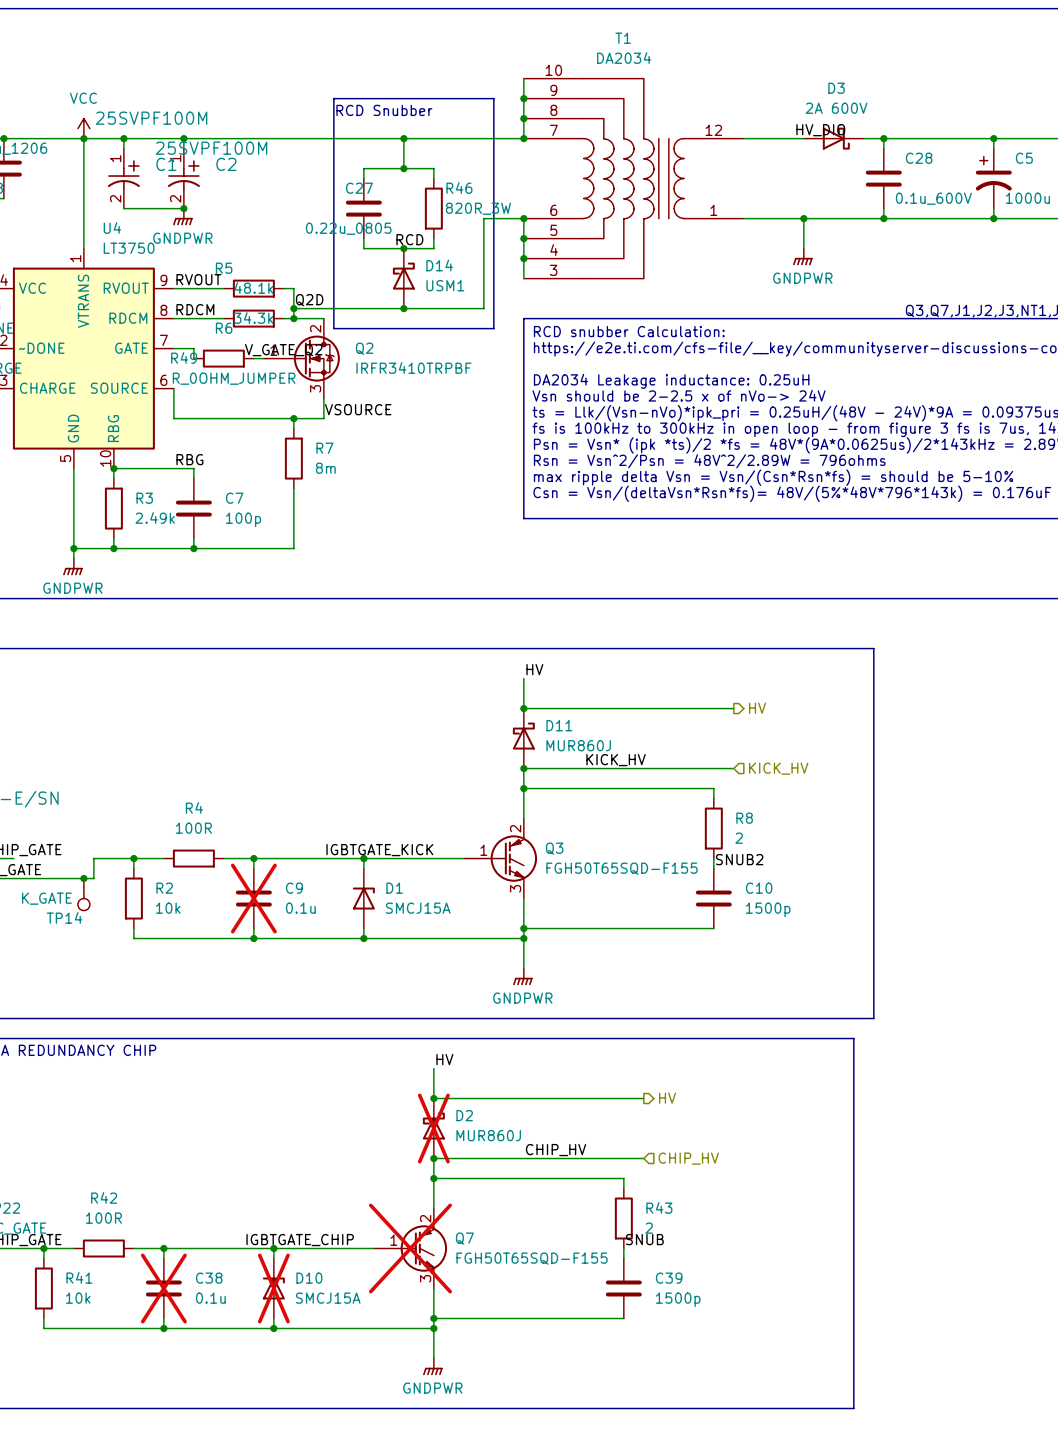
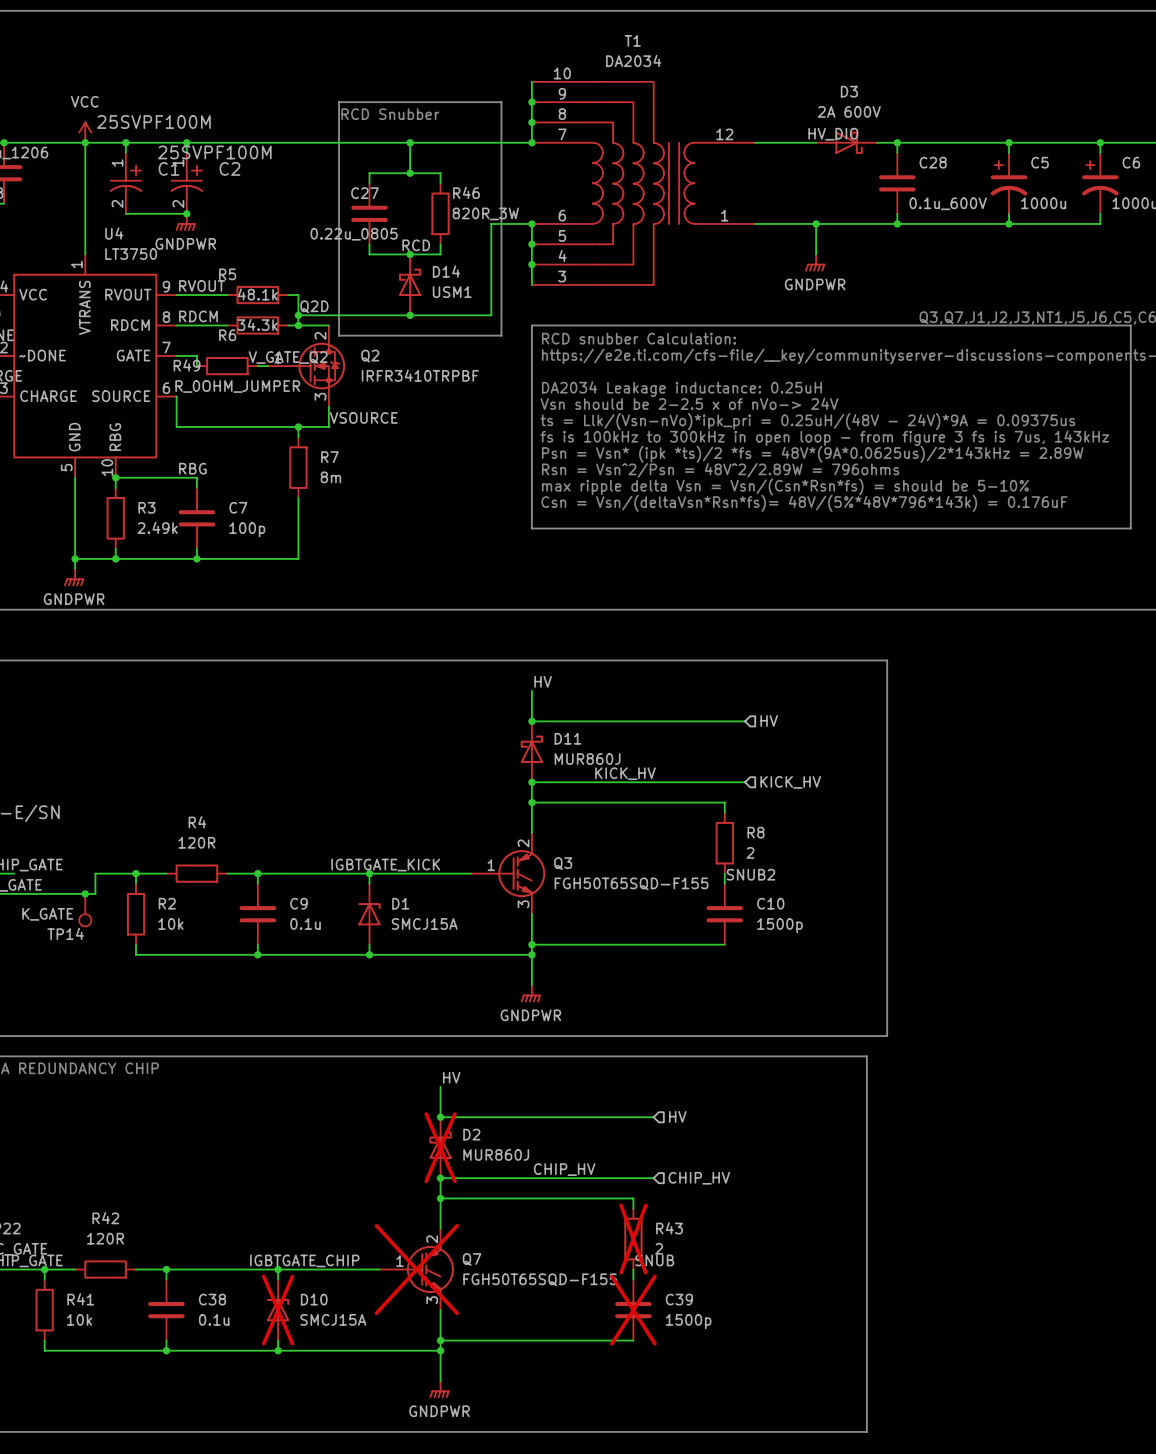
hierarchical label shape: output (757, 708) -> input (769, 720)
R4 value: 100R (193, 828) -> 120R (196, 842)
C9 do-not-place cross: (253, 898) -> none
hierarchical label shape: output (667, 1098) -> input (677, 1116)
R42 value: 100R (103, 1218) -> 120R (105, 1238)
R43 do-not-place cross: none -> (633, 1239)
C38 do-not-place cross: (163, 1288) -> none
C39 do-not-place cross: none -> (633, 1310)

